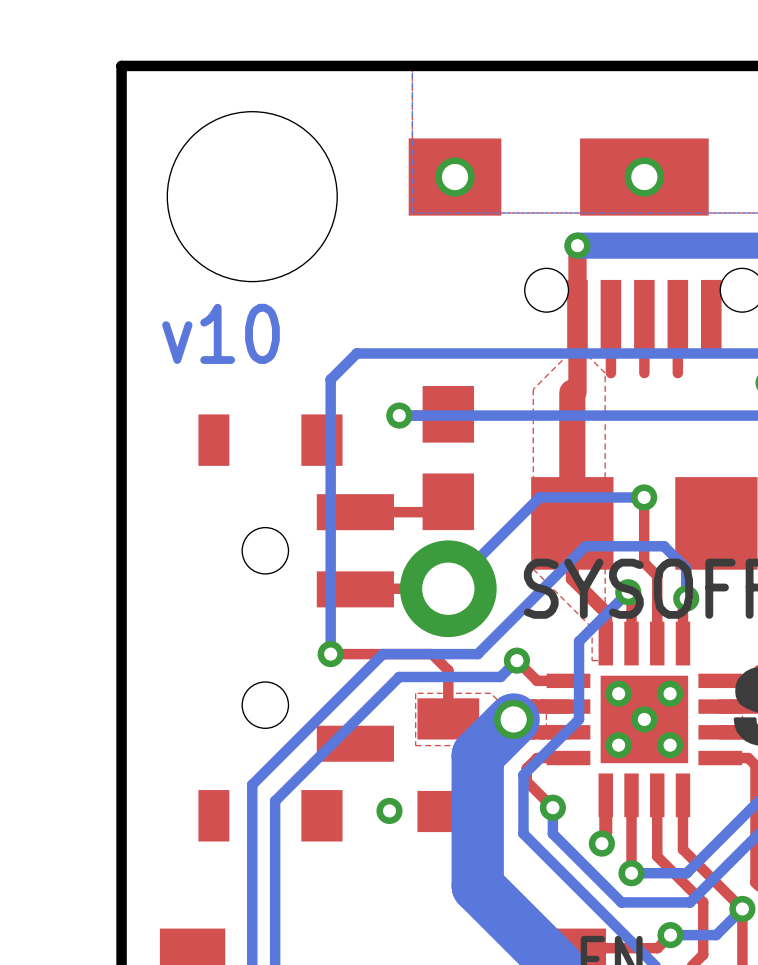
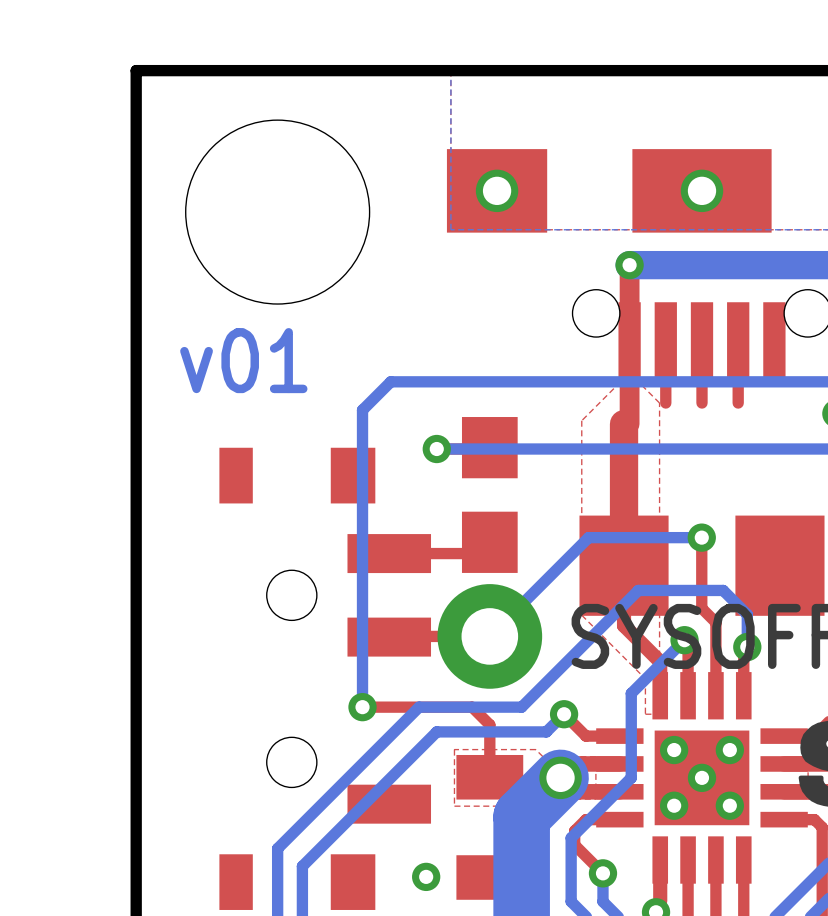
text: v10 (221, 333) -> v01 (243, 360)

